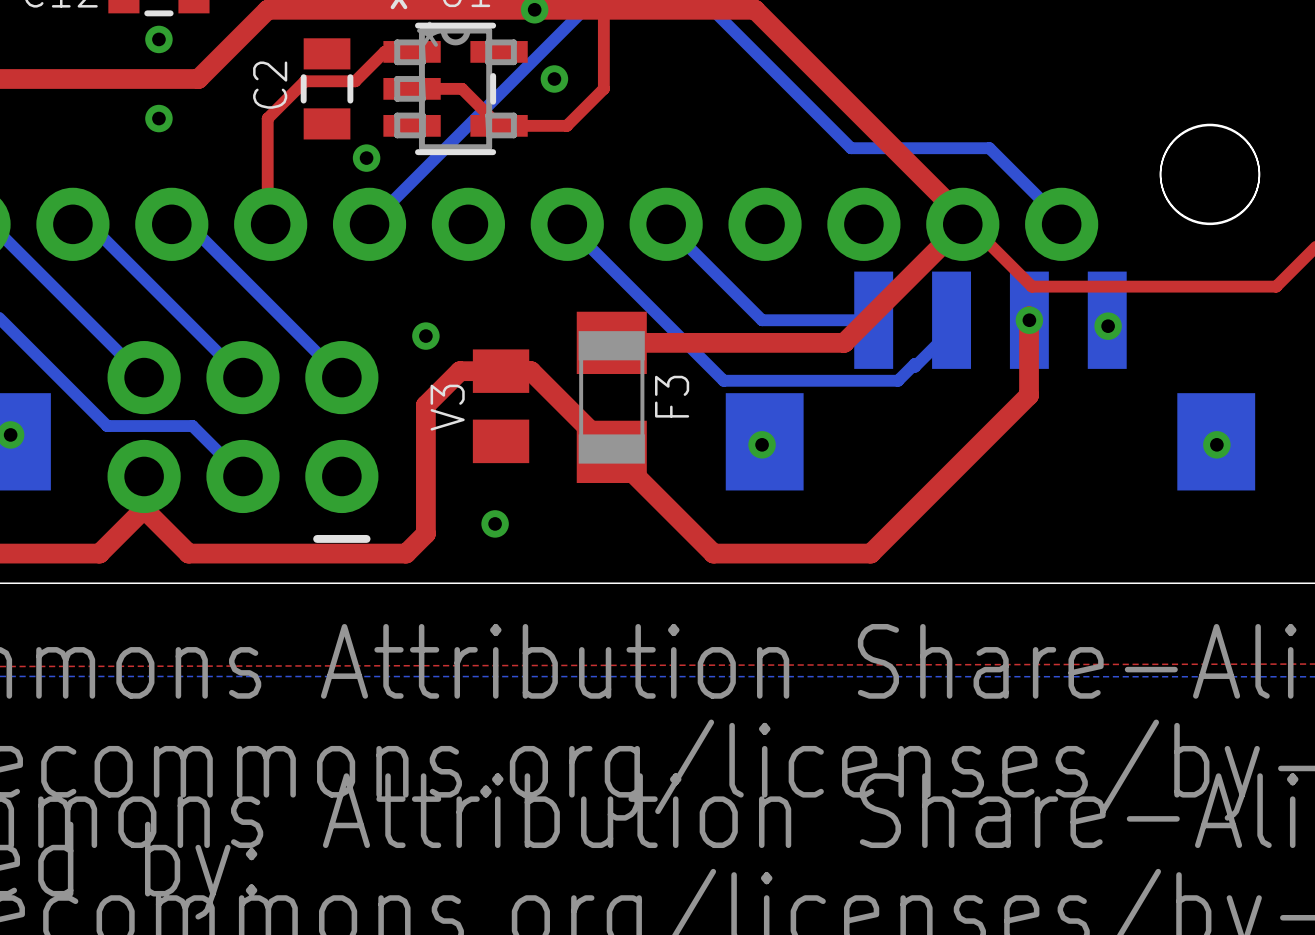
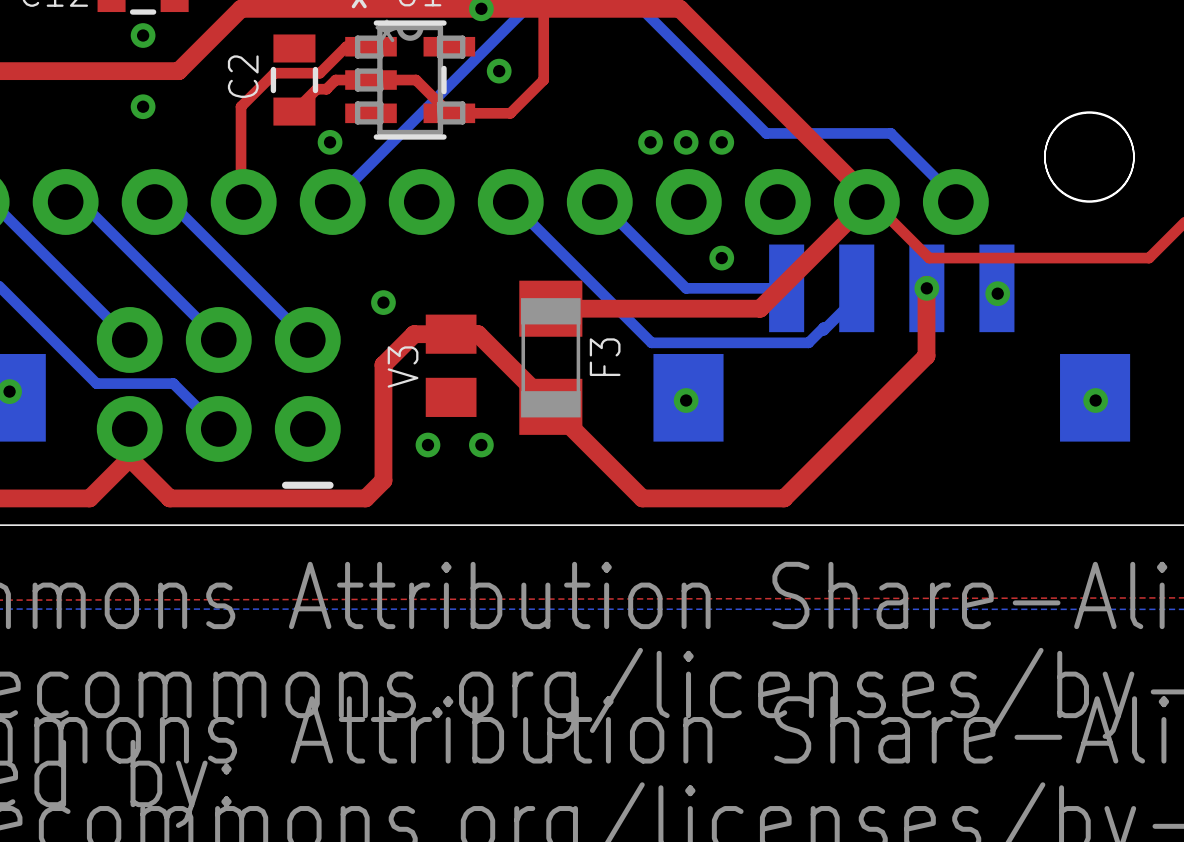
top track: none -> (371, 80) (335, 80) (326, 89) (316, 89) (294, 111)
via: none -> (650, 142)
via: none -> (686, 142)
via: none -> (721, 142)
via: none -> (721, 258)
via: none -> (427, 445)
via: none -> (481, 445)
via: (495, 523) -> none

